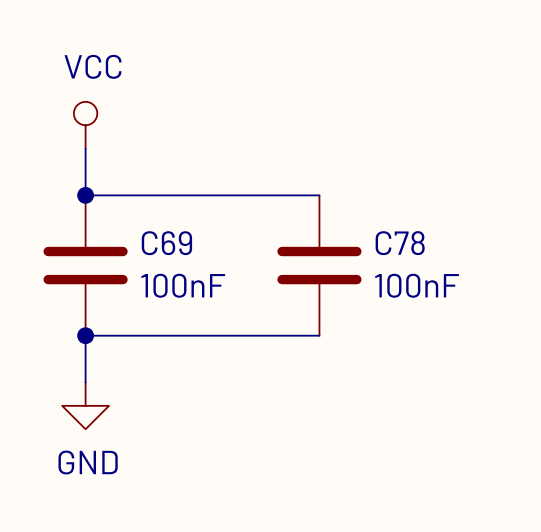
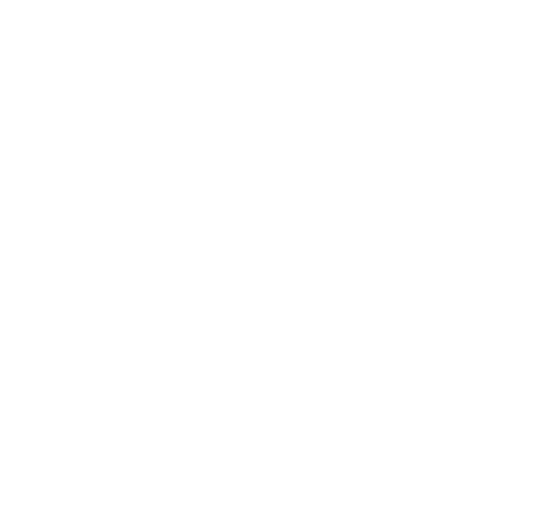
power symbol: VCC (85, 125) -> none
wire: (85, 148) (85, 195) (319, 195) -> none
junction: (85, 195) -> none
C69: 100nF (85, 265) -> none
C78: 100nF (319, 265) -> none
junction: (85, 335) -> none
wire: (319, 335) (85, 335) (85, 382) -> none
power symbol: GND (85, 405) -> none

